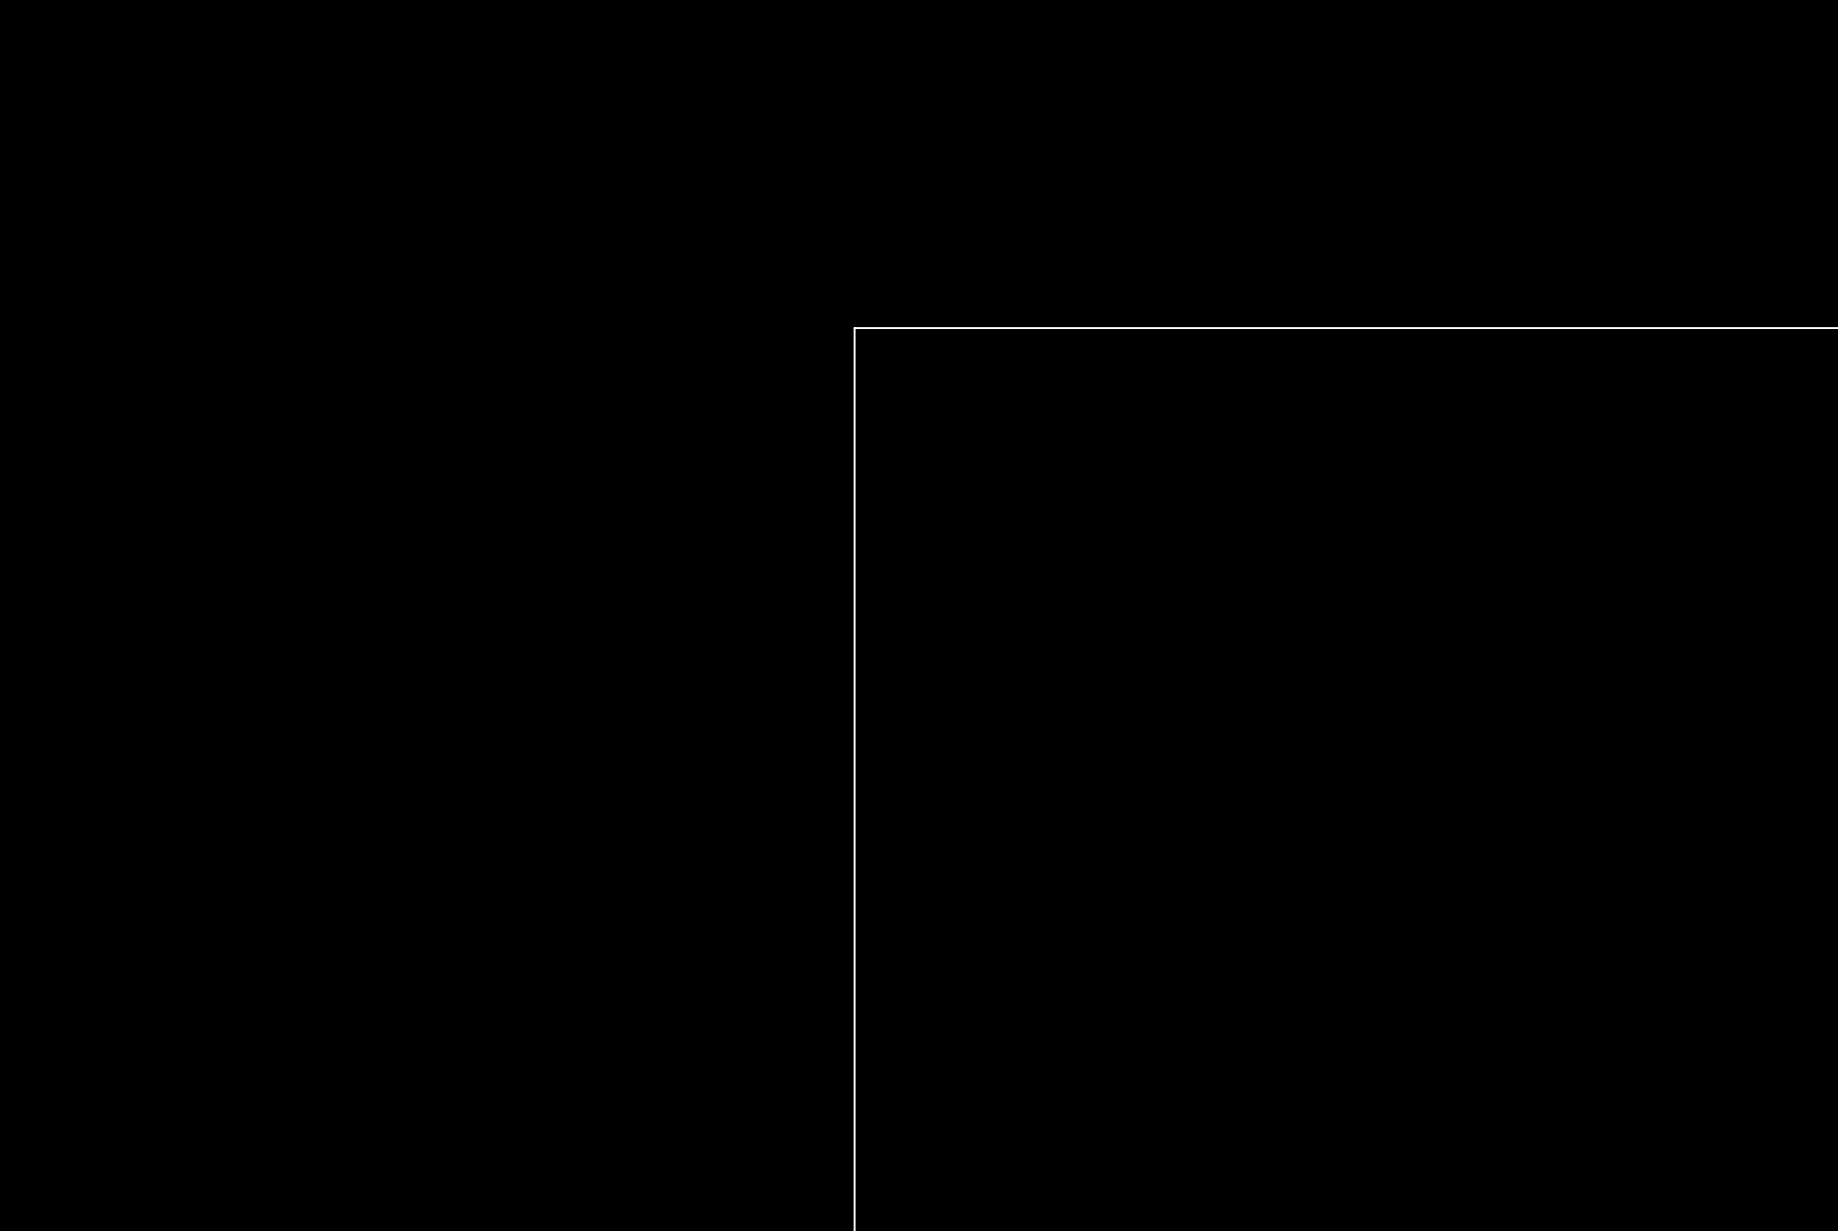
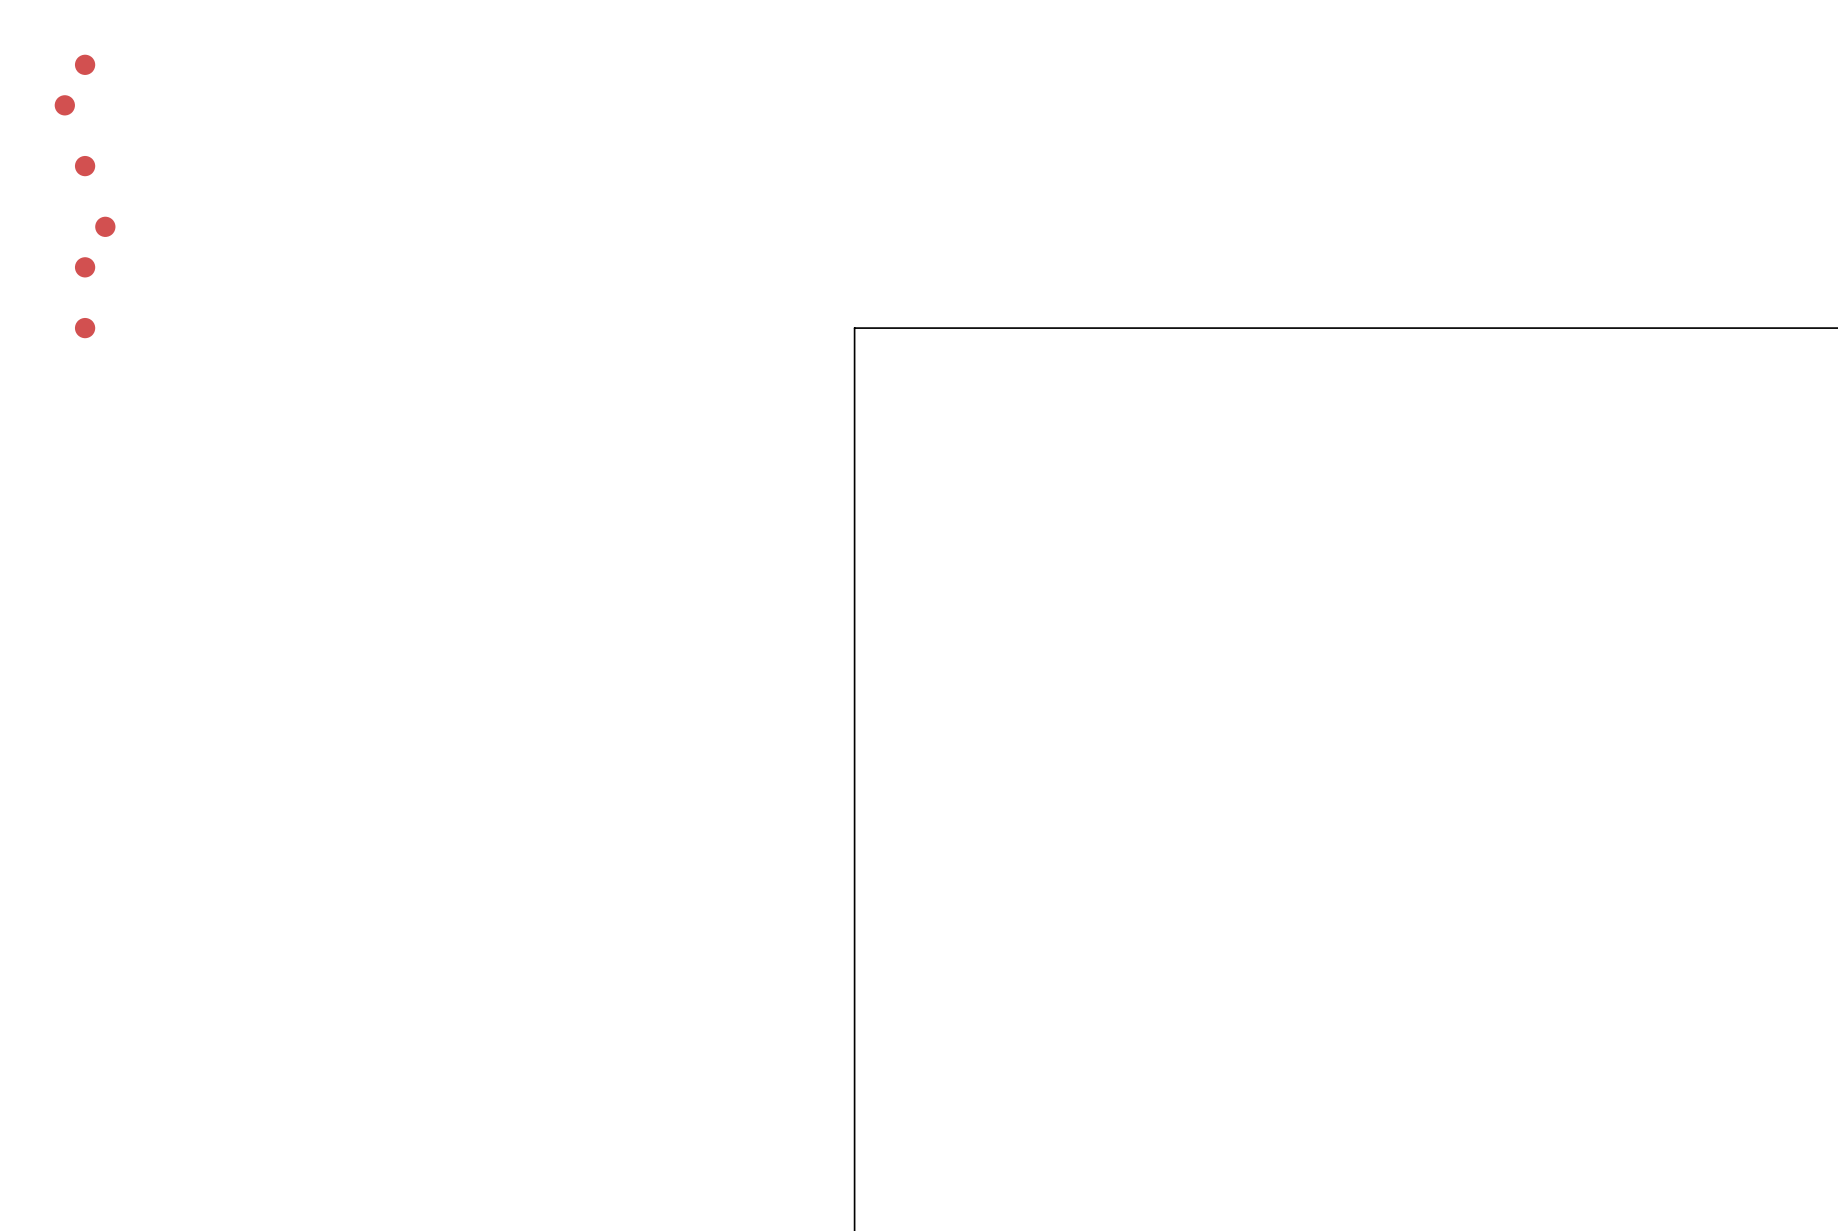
part: none -> (85, 64)
part: none -> (64, 105)
part: none -> (85, 166)
part: none -> (105, 226)
part: none -> (85, 267)
part: none -> (85, 328)

